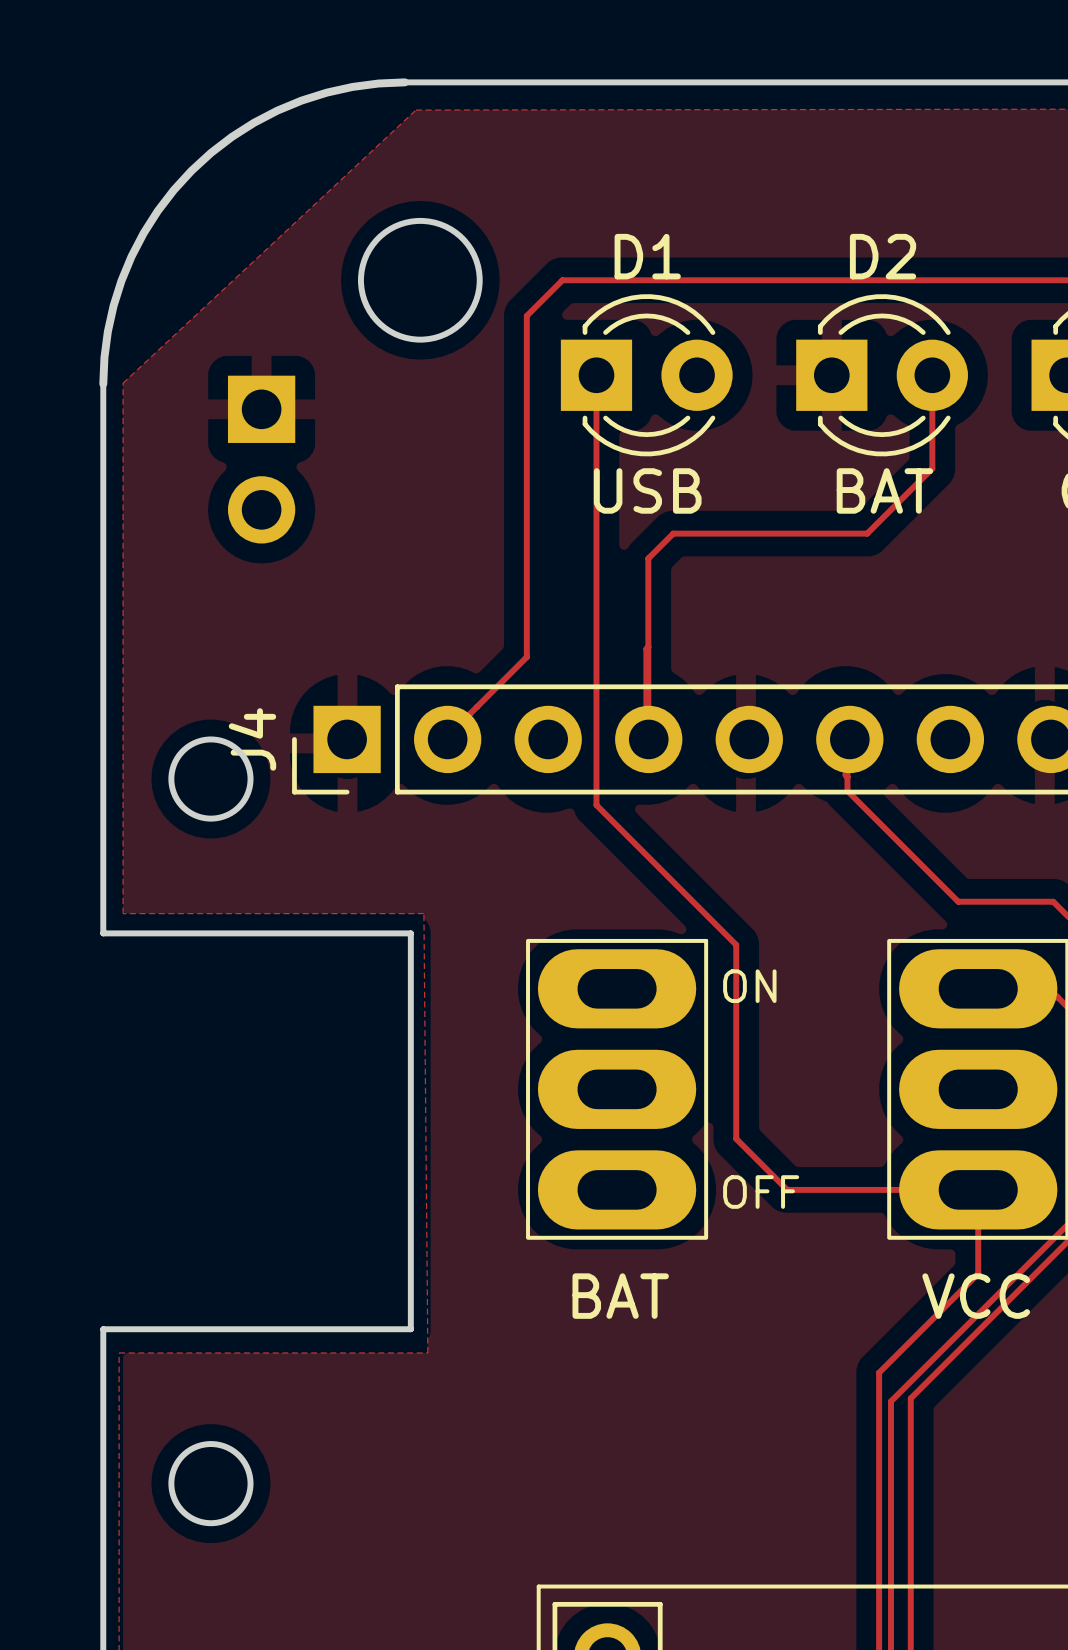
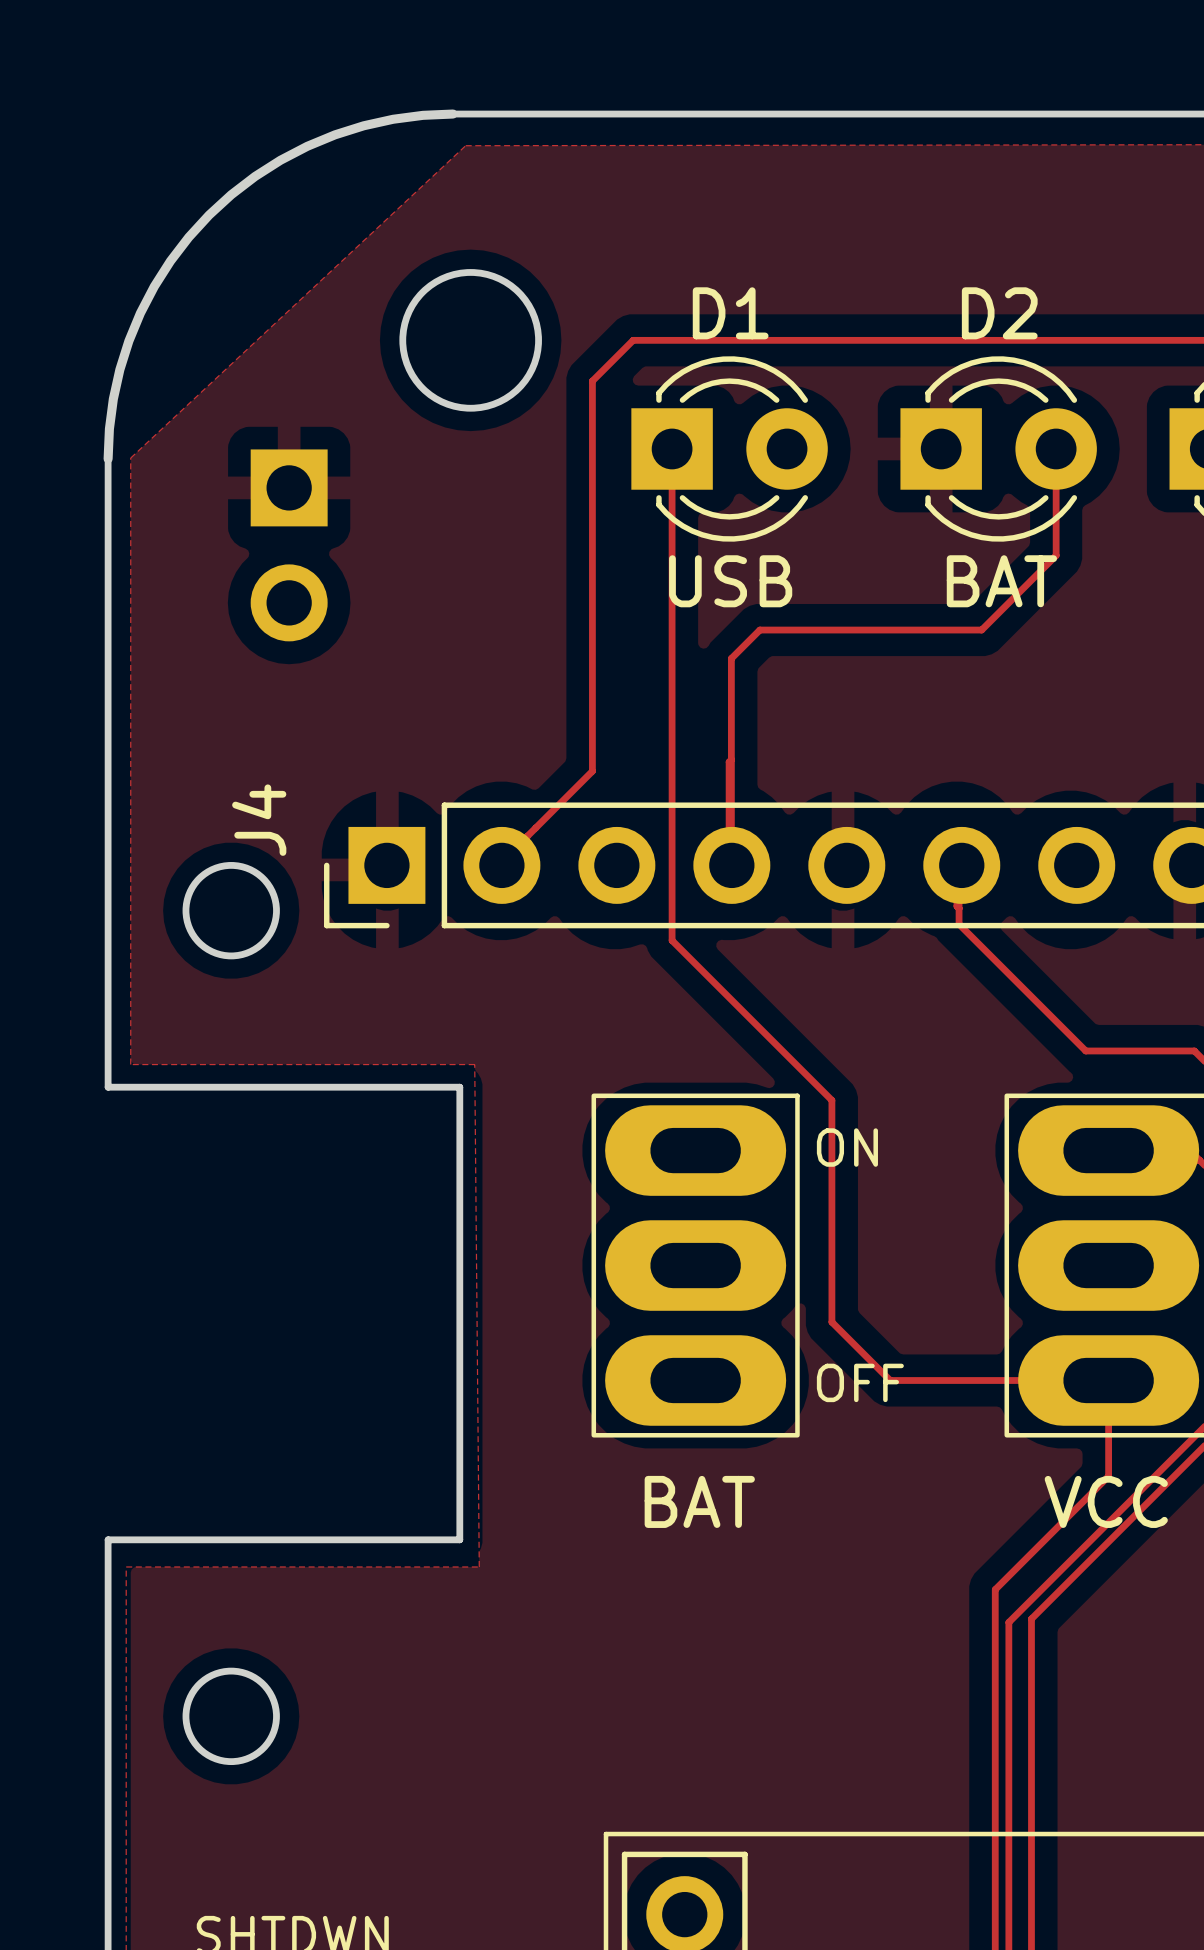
J4 name position: J4 (252, 739) -> J4 (259, 820)

